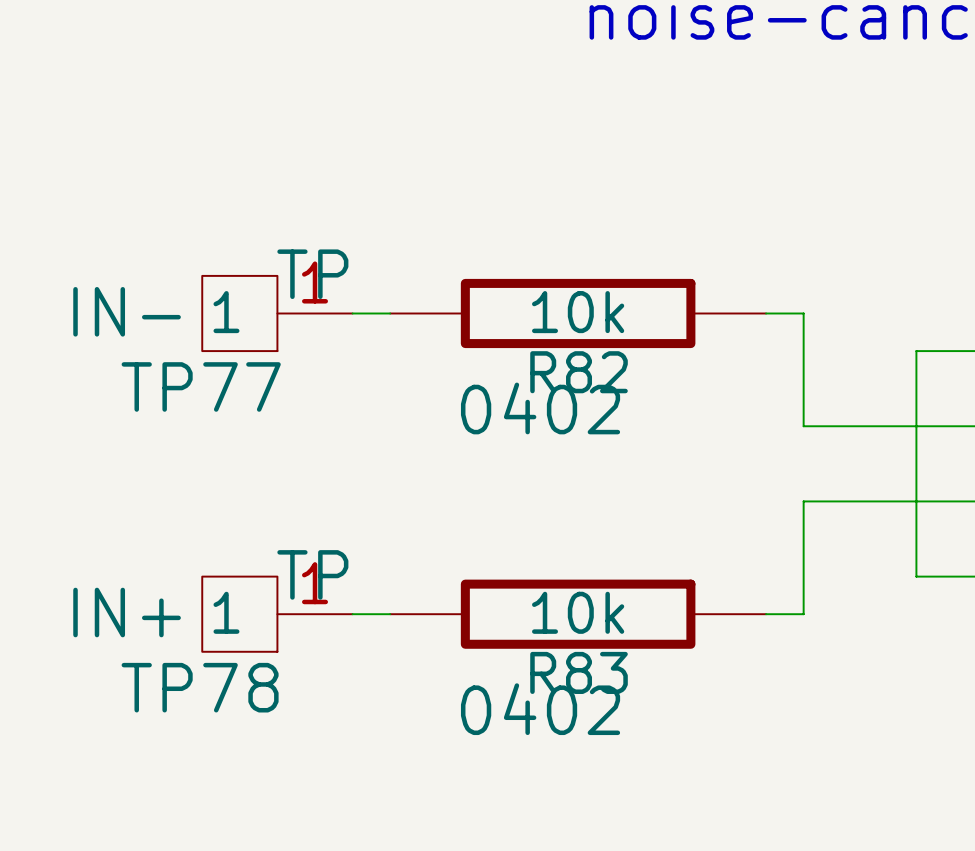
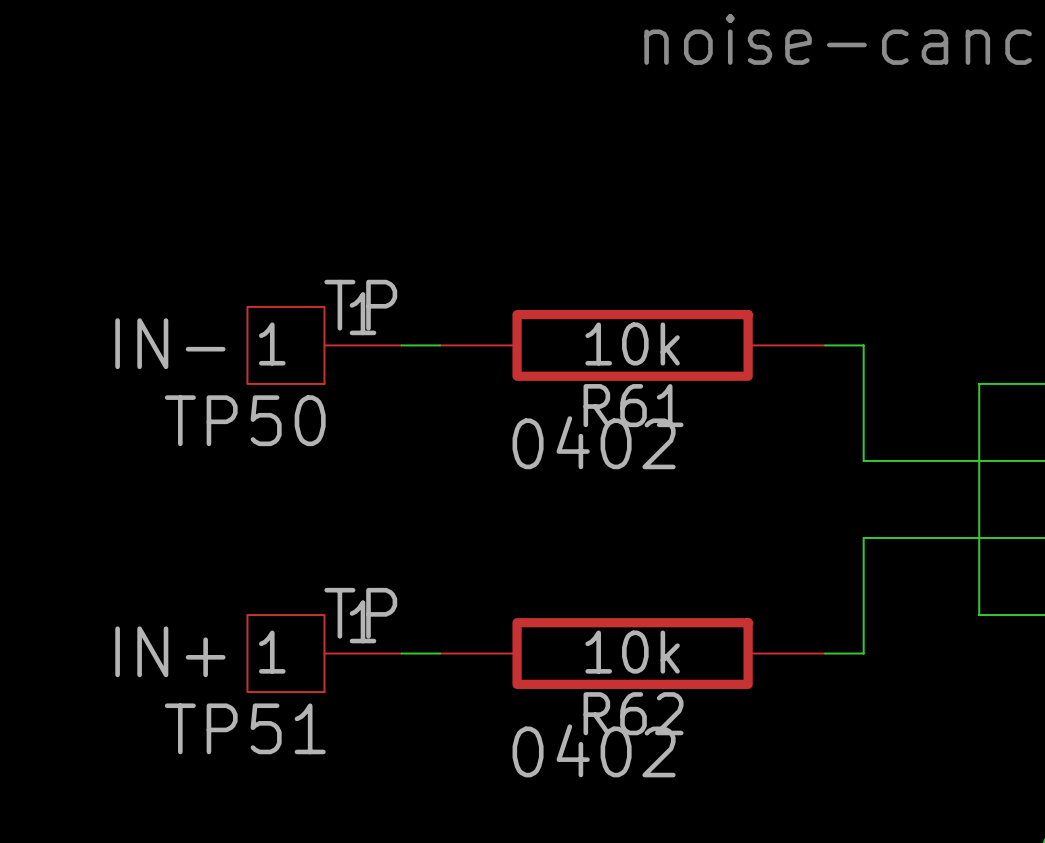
R82 name: R82 (579, 372) -> R61 (633, 405)
TP77 name: TP77 (201, 386) -> TP50 (245, 420)
R83 name: R83 (579, 672) -> R62 (633, 713)
TP78 name: TP78 (200, 687) -> TP51 (245, 728)

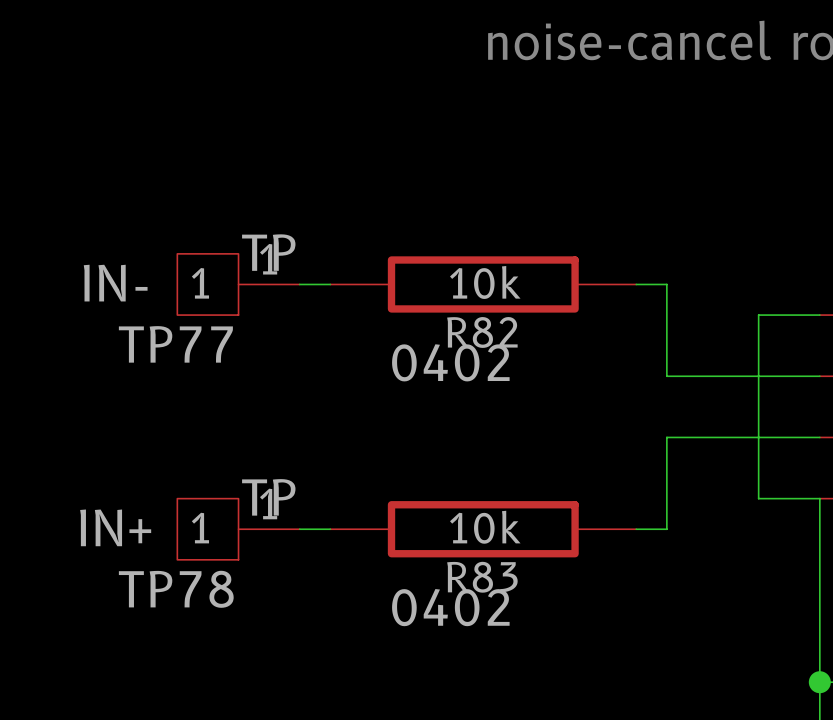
R61 name: R61 (633, 405) -> R82 (482, 332)
TP50 name: TP50 (245, 420) -> TP77 (175, 344)
R62 name: R62 (633, 713) -> R83 (482, 577)
TP51 name: TP51 (245, 728) -> TP78 (176, 589)

